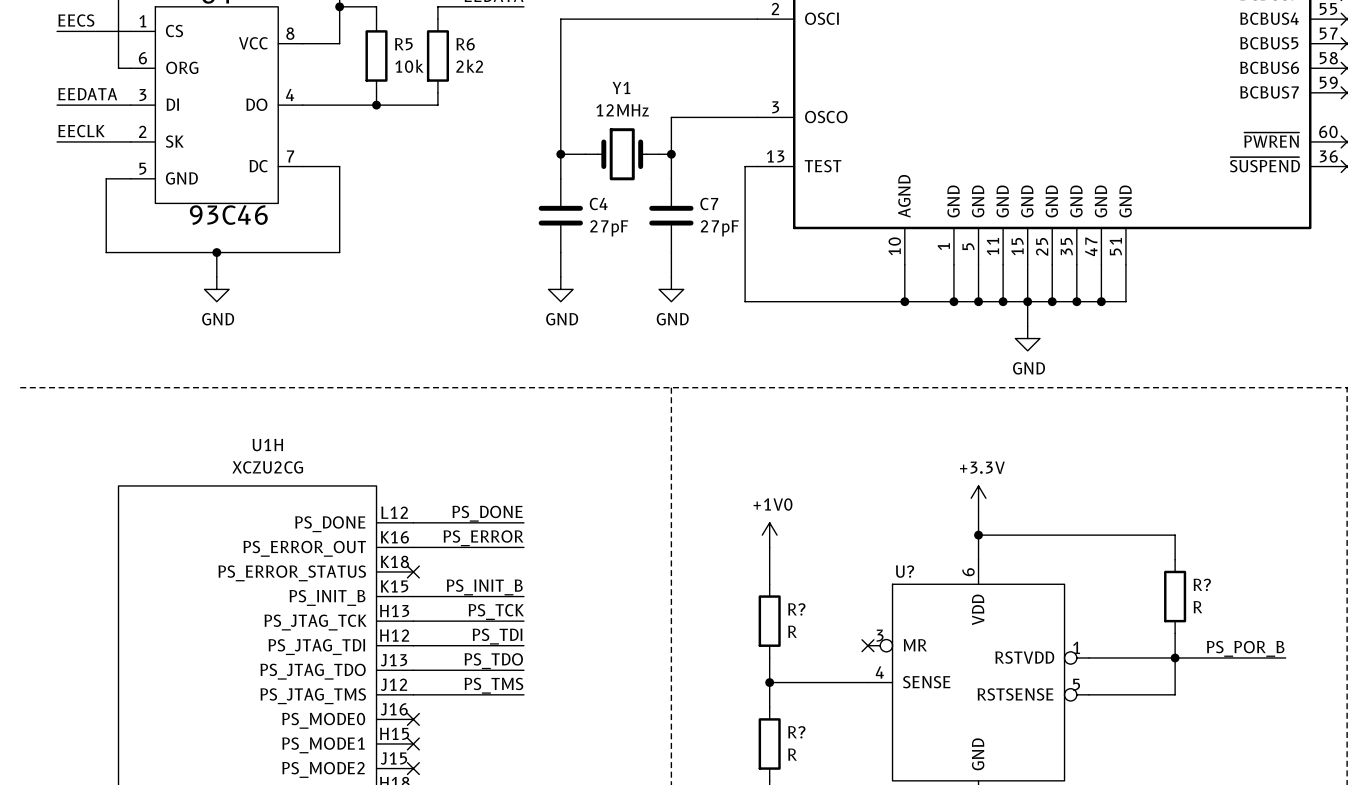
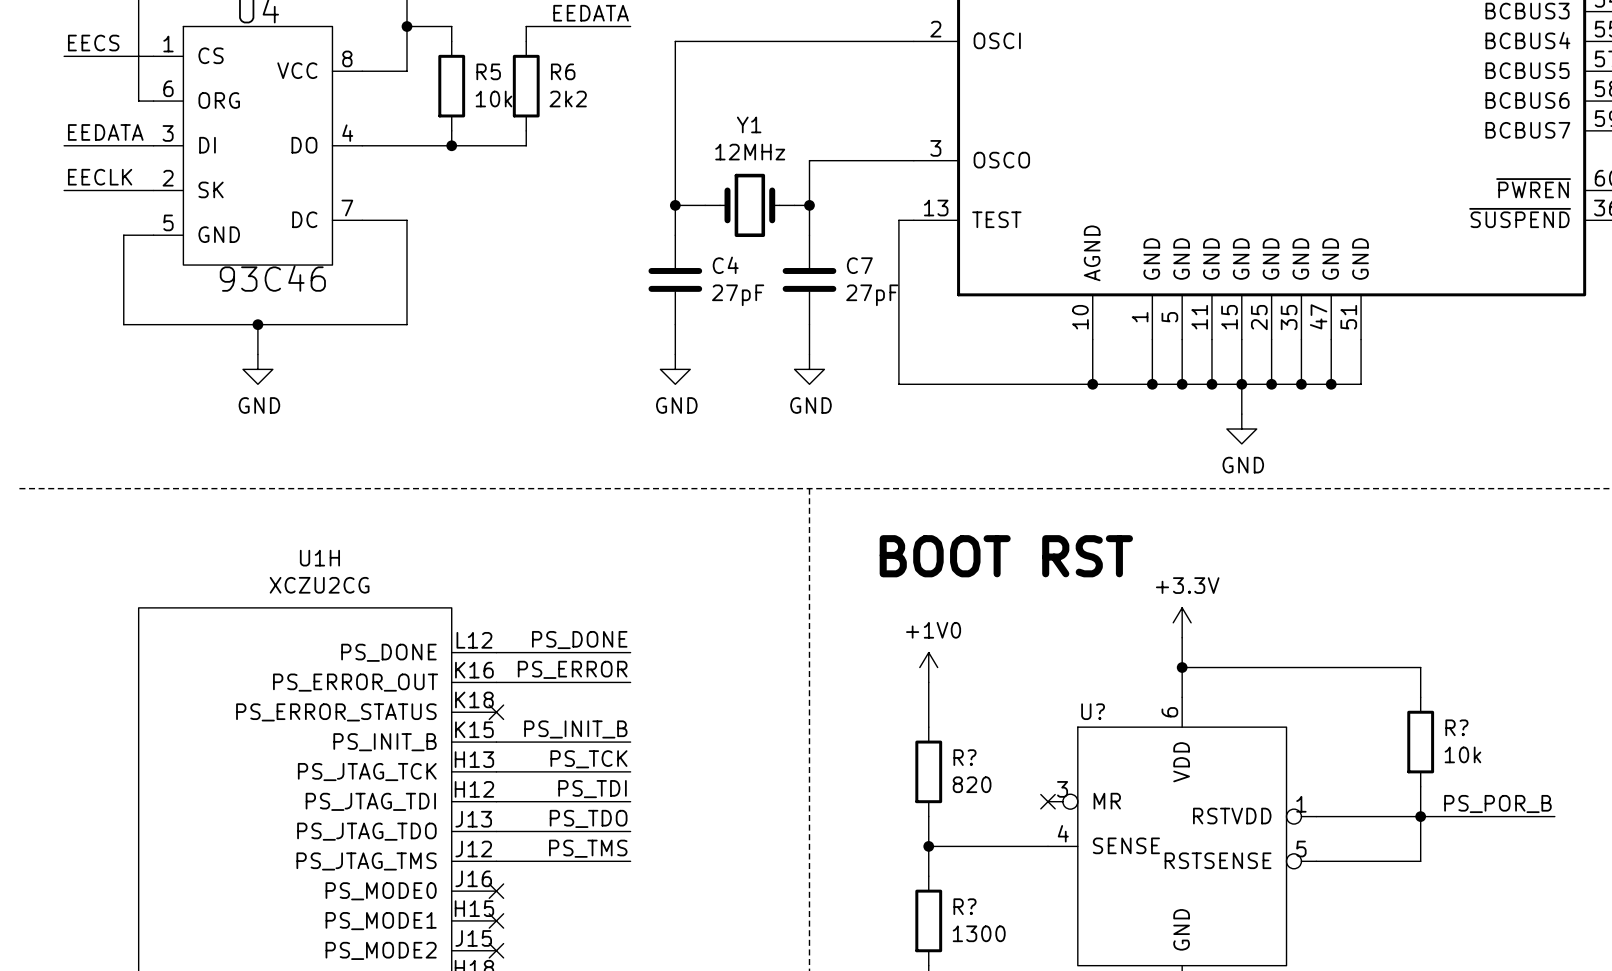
text: none -> BOOT RST (1006, 556)
R? value: R (1197, 607) -> 10k (1462, 754)
R? value: R (792, 631) -> 820 (972, 784)
R? value: R (792, 754) -> 1300 (979, 933)

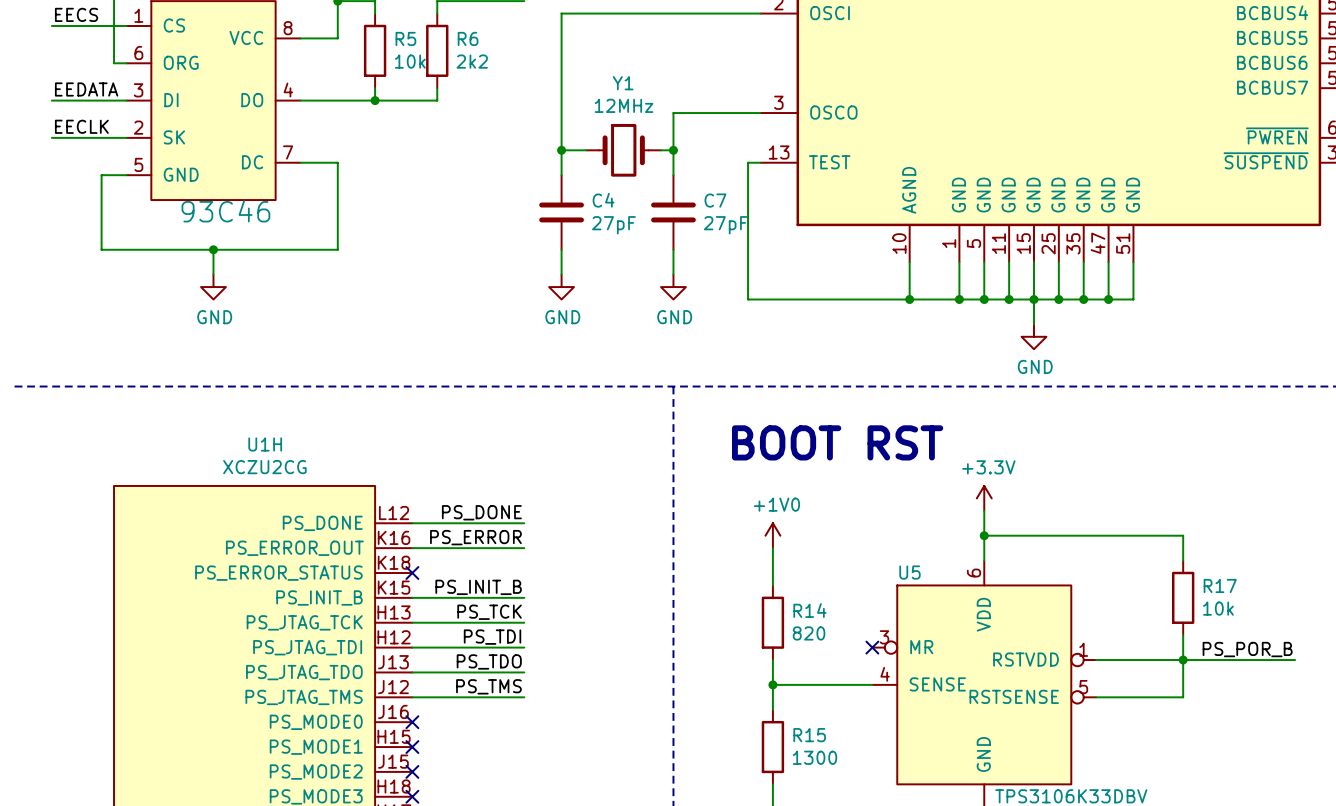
U? name: U? (1093, 711) -> U5 (909, 572)
R? name: R? (1456, 727) -> R17 (1220, 585)
R? name: R? (964, 757) -> R14 (809, 610)
R? name: R? (964, 906) -> R15 (809, 735)

